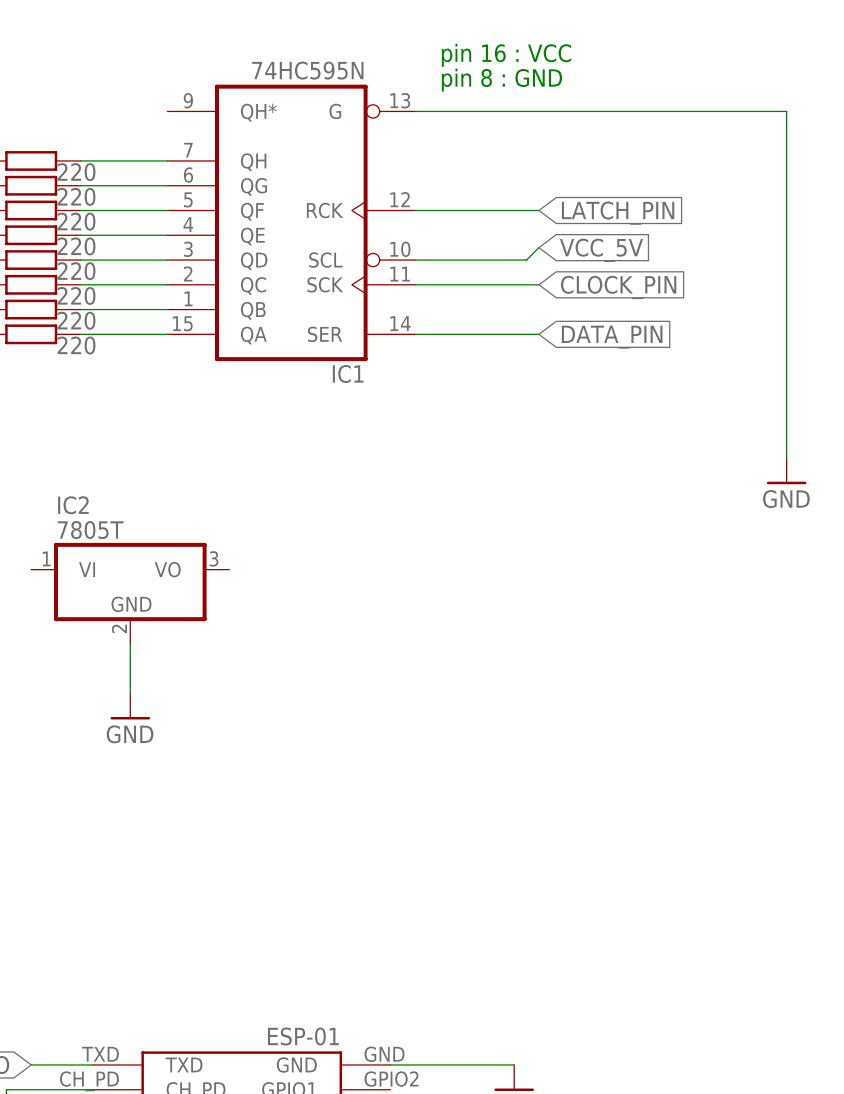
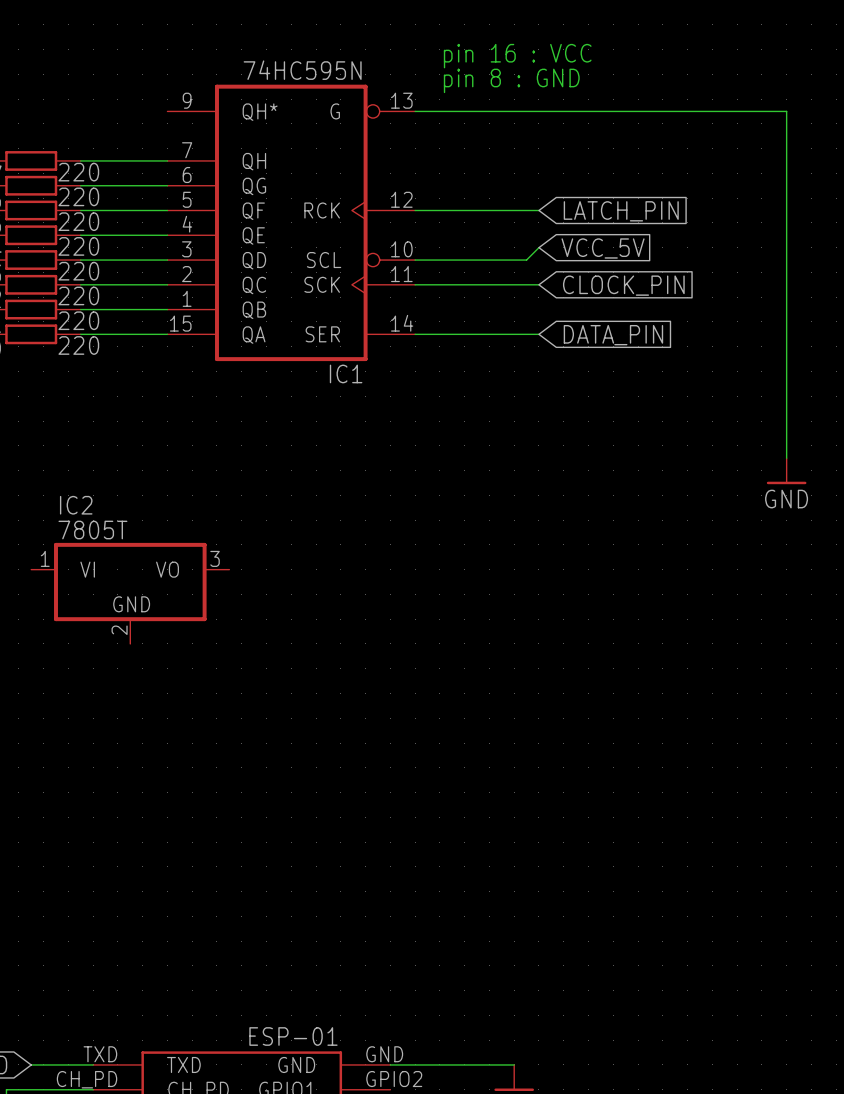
wire: (130, 643) (130, 693) -> none
power symbol: GND (130, 706) -> none

